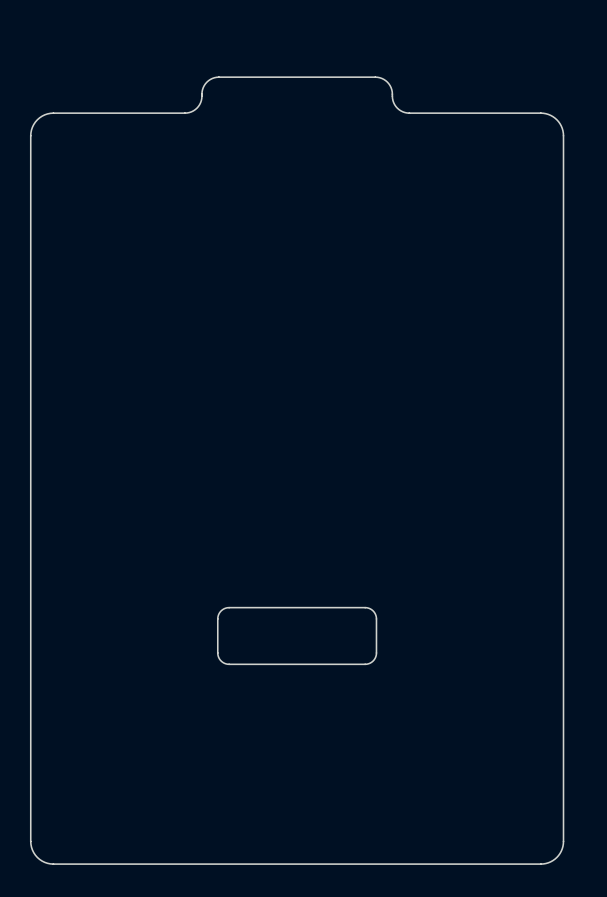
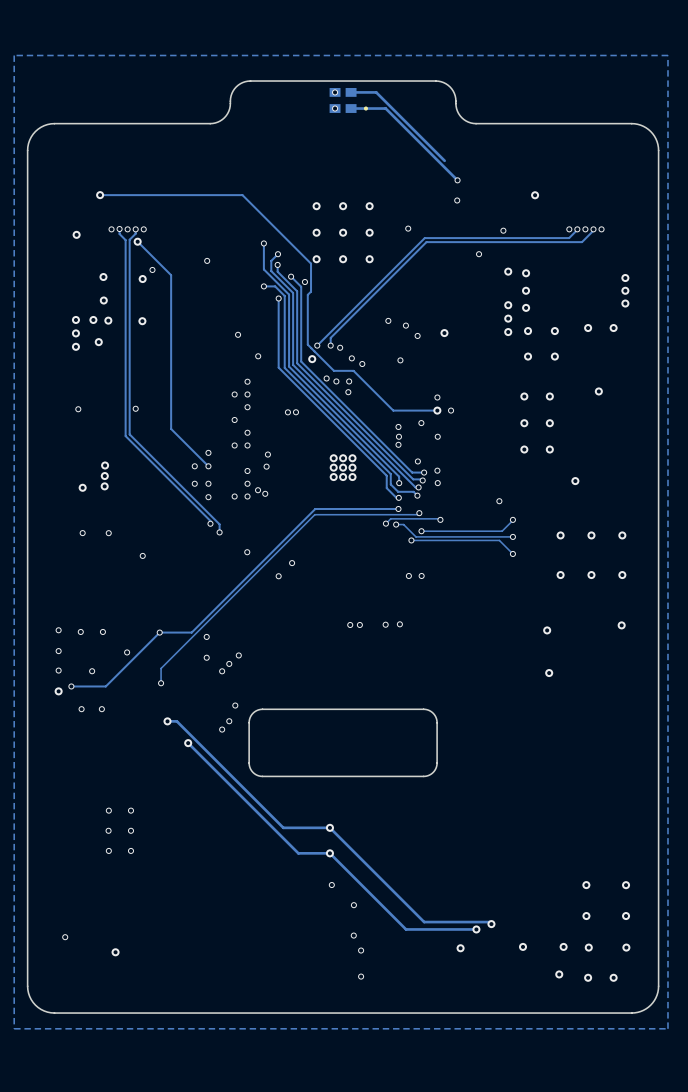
zone outline: none -> (667, 55) (14, 55) (14, 1028) (667, 1028) (667, 55)
via: none -> (335, 92)
track: none -> (351, 92) (376, 92) (444, 160)
part: none -> (348, 100)
via: none -> (335, 108)
track: none -> (351, 108) (385, 108) (457, 180)
via: none -> (457, 180)
track: none -> (100, 195) (242, 195) (311, 263) (311, 291) (307, 294) (307, 344) (333, 370) (353, 370) (393, 410) (437, 410)
via: none -> (100, 195)
via: none -> (535, 195)
via: none -> (457, 200)
via: none -> (316, 206)
via: none -> (343, 206)
via: none -> (369, 206)
via: none -> (408, 228)
via: none -> (111, 229)
track: none -> (119, 229) (119, 234) (125, 240) (125, 436) (210, 520) (210, 523)
via: none -> (119, 229)
via: none -> (127, 229)
track: none -> (135, 229) (135, 233) (129, 239) (129, 434) (219, 524) (219, 532)
via: none -> (135, 229)
via: none -> (143, 229)
via: none -> (569, 229)
track: none -> (577, 229) (569, 238) (424, 238) (317, 345)
via: none -> (577, 229)
via: none -> (585, 229)
track: none -> (593, 229) (582, 242) (426, 242) (330, 337) (330, 345)
via: none -> (593, 229)
via: none -> (601, 229)
via: none -> (503, 230)
via: none -> (316, 232)
via: none -> (343, 232)
via: none -> (369, 232)
via: none -> (76, 234)
track: none -> (137, 241) (171, 275) (171, 428) (208, 466)
via: none -> (137, 241)
track: none -> (263, 243) (263, 269) (289, 294) (289, 366) (399, 476) (399, 483)
via: none -> (263, 243)
track: none -> (277, 254) (271, 260) (271, 271) (293, 292) (293, 364) (415, 487) (418, 487)
via: none -> (277, 254)
via: none -> (479, 254)
via: none -> (316, 259)
via: none -> (343, 259)
via: none -> (369, 259)
via: none -> (207, 260)
track: none -> (277, 264) (277, 271) (297, 291) (297, 363) (413, 479) (422, 480)
via: none -> (277, 264)
via: none -> (152, 269)
via: none -> (508, 271)
via: none -> (526, 273)
via: none -> (103, 277)
track: none -> (291, 276) (301, 286) (301, 361) (412, 472) (424, 472)
via: none -> (291, 276)
via: none -> (625, 278)
via: none -> (142, 279)
via: none -> (304, 281)
track: none -> (263, 286) (275, 286) (284, 295) (284, 367) (390, 474) (390, 484) (398, 491) (413, 491) (417, 495)
via: none -> (263, 286)
via: none -> (526, 290)
via: none -> (625, 290)
track: none -> (278, 298) (278, 367) (386, 475) (386, 488) (398, 497)
via: none -> (278, 298)
via: none -> (103, 300)
via: none -> (625, 303)
via: none -> (508, 305)
via: none -> (526, 307)
via: none -> (508, 318)
via: none -> (75, 319)
via: none -> (93, 319)
via: none -> (108, 320)
via: none -> (142, 321)
via: none -> (388, 320)
via: none -> (405, 325)
via: none -> (588, 328)
via: none -> (613, 328)
via: none -> (528, 331)
via: none -> (554, 331)
via: none -> (444, 333)
via: none -> (508, 332)
via: none -> (75, 333)
via: none -> (238, 334)
via: none -> (417, 335)
via: none -> (98, 342)
via: none -> (317, 345)
via: none -> (330, 345)
via: none -> (75, 346)
via: none -> (340, 347)
via: none -> (258, 356)
via: none -> (528, 356)
via: none -> (554, 356)
via: none -> (312, 359)
via: none -> (351, 358)
via: none -> (400, 360)
via: none -> (362, 364)
via: none -> (326, 378)
via: none -> (336, 381)
via: none -> (349, 381)
via: none -> (247, 381)
via: none -> (348, 392)
via: none -> (598, 391)
via: none -> (234, 394)
via: none -> (247, 394)
via: none -> (524, 396)
via: none -> (549, 396)
via: none -> (437, 397)
via: none -> (247, 407)
via: none -> (135, 408)
via: none -> (78, 409)
via: none -> (437, 410)
via: none -> (451, 410)
via: none -> (287, 412)
via: none -> (295, 412)
via: none -> (234, 419)
via: none -> (421, 423)
via: none -> (524, 423)
via: none -> (549, 423)
via: none -> (398, 426)
via: none -> (247, 432)
via: none -> (398, 436)
via: none -> (437, 436)
via: none -> (234, 445)
via: none -> (247, 445)
via: none -> (398, 444)
via: none -> (524, 449)
via: none -> (549, 449)
via: none -> (208, 452)
via: none -> (267, 454)
via: none -> (333, 458)
via: none -> (343, 458)
via: none -> (352, 458)
via: none -> (417, 461)
via: none -> (105, 465)
via: none -> (194, 466)
via: none -> (208, 466)
via: none -> (266, 466)
via: none -> (333, 467)
via: none -> (343, 467)
via: none -> (352, 467)
via: none -> (247, 471)
via: none -> (437, 470)
via: none -> (424, 472)
via: none -> (104, 476)
via: none -> (333, 477)
via: none -> (343, 477)
via: none -> (352, 477)
via: none -> (422, 480)
via: none -> (575, 481)
via: none -> (399, 483)
via: none -> (437, 483)
via: none -> (194, 483)
via: none -> (208, 483)
via: none -> (247, 483)
via: none -> (104, 486)
via: none -> (82, 487)
via: none -> (418, 487)
via: none -> (258, 490)
via: none -> (265, 493)
via: none -> (234, 496)
via: none -> (247, 496)
via: none -> (417, 495)
via: none -> (208, 497)
via: none -> (398, 497)
via: none -> (499, 501)
track: none -> (398, 508) (315, 508) (191, 632) (159, 632) (105, 686) (71, 686)
via: none -> (398, 508)
track: none -> (419, 513) (417, 514) (314, 514) (161, 668) (161, 683)
via: none -> (419, 513)
track: none -> (440, 519) (390, 518) (385, 523)
via: none -> (440, 519)
track: none -> (512, 519) (502, 531) (421, 531)
via: none -> (512, 519)
via: none -> (210, 523)
via: none -> (385, 523)
track: none -> (396, 524) (403, 524) (416, 536) (512, 536)
via: none -> (396, 524)
via: none -> (421, 531)
via: none -> (82, 533)
via: none -> (108, 533)
via: none -> (219, 532)
via: none -> (560, 535)
via: none -> (591, 535)
via: none -> (622, 535)
via: none -> (512, 536)
track: none -> (411, 540) (499, 540) (512, 553)
via: none -> (411, 540)
via: none -> (247, 552)
via: none -> (512, 553)
via: none -> (142, 555)
via: none -> (292, 563)
via: none -> (560, 575)
via: none -> (591, 575)
via: none -> (622, 575)
via: none -> (278, 576)
via: none -> (408, 575)
via: none -> (421, 575)
via: none -> (399, 624)
via: none -> (350, 624)
via: none -> (359, 624)
via: none -> (385, 624)
via: none -> (621, 625)
via: none -> (58, 630)
via: none -> (547, 630)
via: none -> (80, 631)
via: none -> (102, 631)
via: none -> (159, 632)
via: none -> (206, 636)
via: none -> (58, 651)
via: none -> (127, 652)
via: none -> (238, 655)
via: none -> (206, 657)
via: none -> (229, 663)
via: none -> (58, 670)
via: none -> (92, 671)
via: none -> (222, 671)
via: none -> (549, 673)
via: none -> (161, 683)
via: none -> (71, 686)
via: none -> (58, 691)
via: none -> (235, 705)
via: none -> (81, 709)
via: none -> (101, 709)
track: none -> (167, 721) (176, 721) (283, 827) (329, 827) (424, 922) (489, 922) (491, 924)
via: none -> (167, 721)
via: none -> (229, 721)
via: none -> (222, 729)
track: none -> (188, 743) (298, 853) (329, 853) (406, 929) (476, 929)
via: none -> (188, 743)
via: none -> (108, 810)
via: none -> (130, 810)
via: none -> (329, 827)
via: none -> (108, 830)
via: none -> (130, 830)
via: none -> (108, 850)
via: none -> (130, 850)
via: none -> (329, 853)
via: none -> (331, 885)
via: none -> (586, 885)
via: none -> (626, 885)
via: none -> (353, 905)
via: none -> (586, 916)
via: none -> (626, 916)
via: none -> (491, 924)
via: none -> (476, 929)
via: none -> (353, 935)
via: none -> (65, 937)
via: none -> (523, 946)
via: none -> (563, 946)
via: none -> (588, 947)
via: none -> (626, 947)
via: none -> (460, 948)
via: none -> (361, 950)
via: none -> (115, 952)
via: none -> (559, 974)
via: none -> (361, 976)
via: none -> (588, 977)
via: none -> (613, 977)

